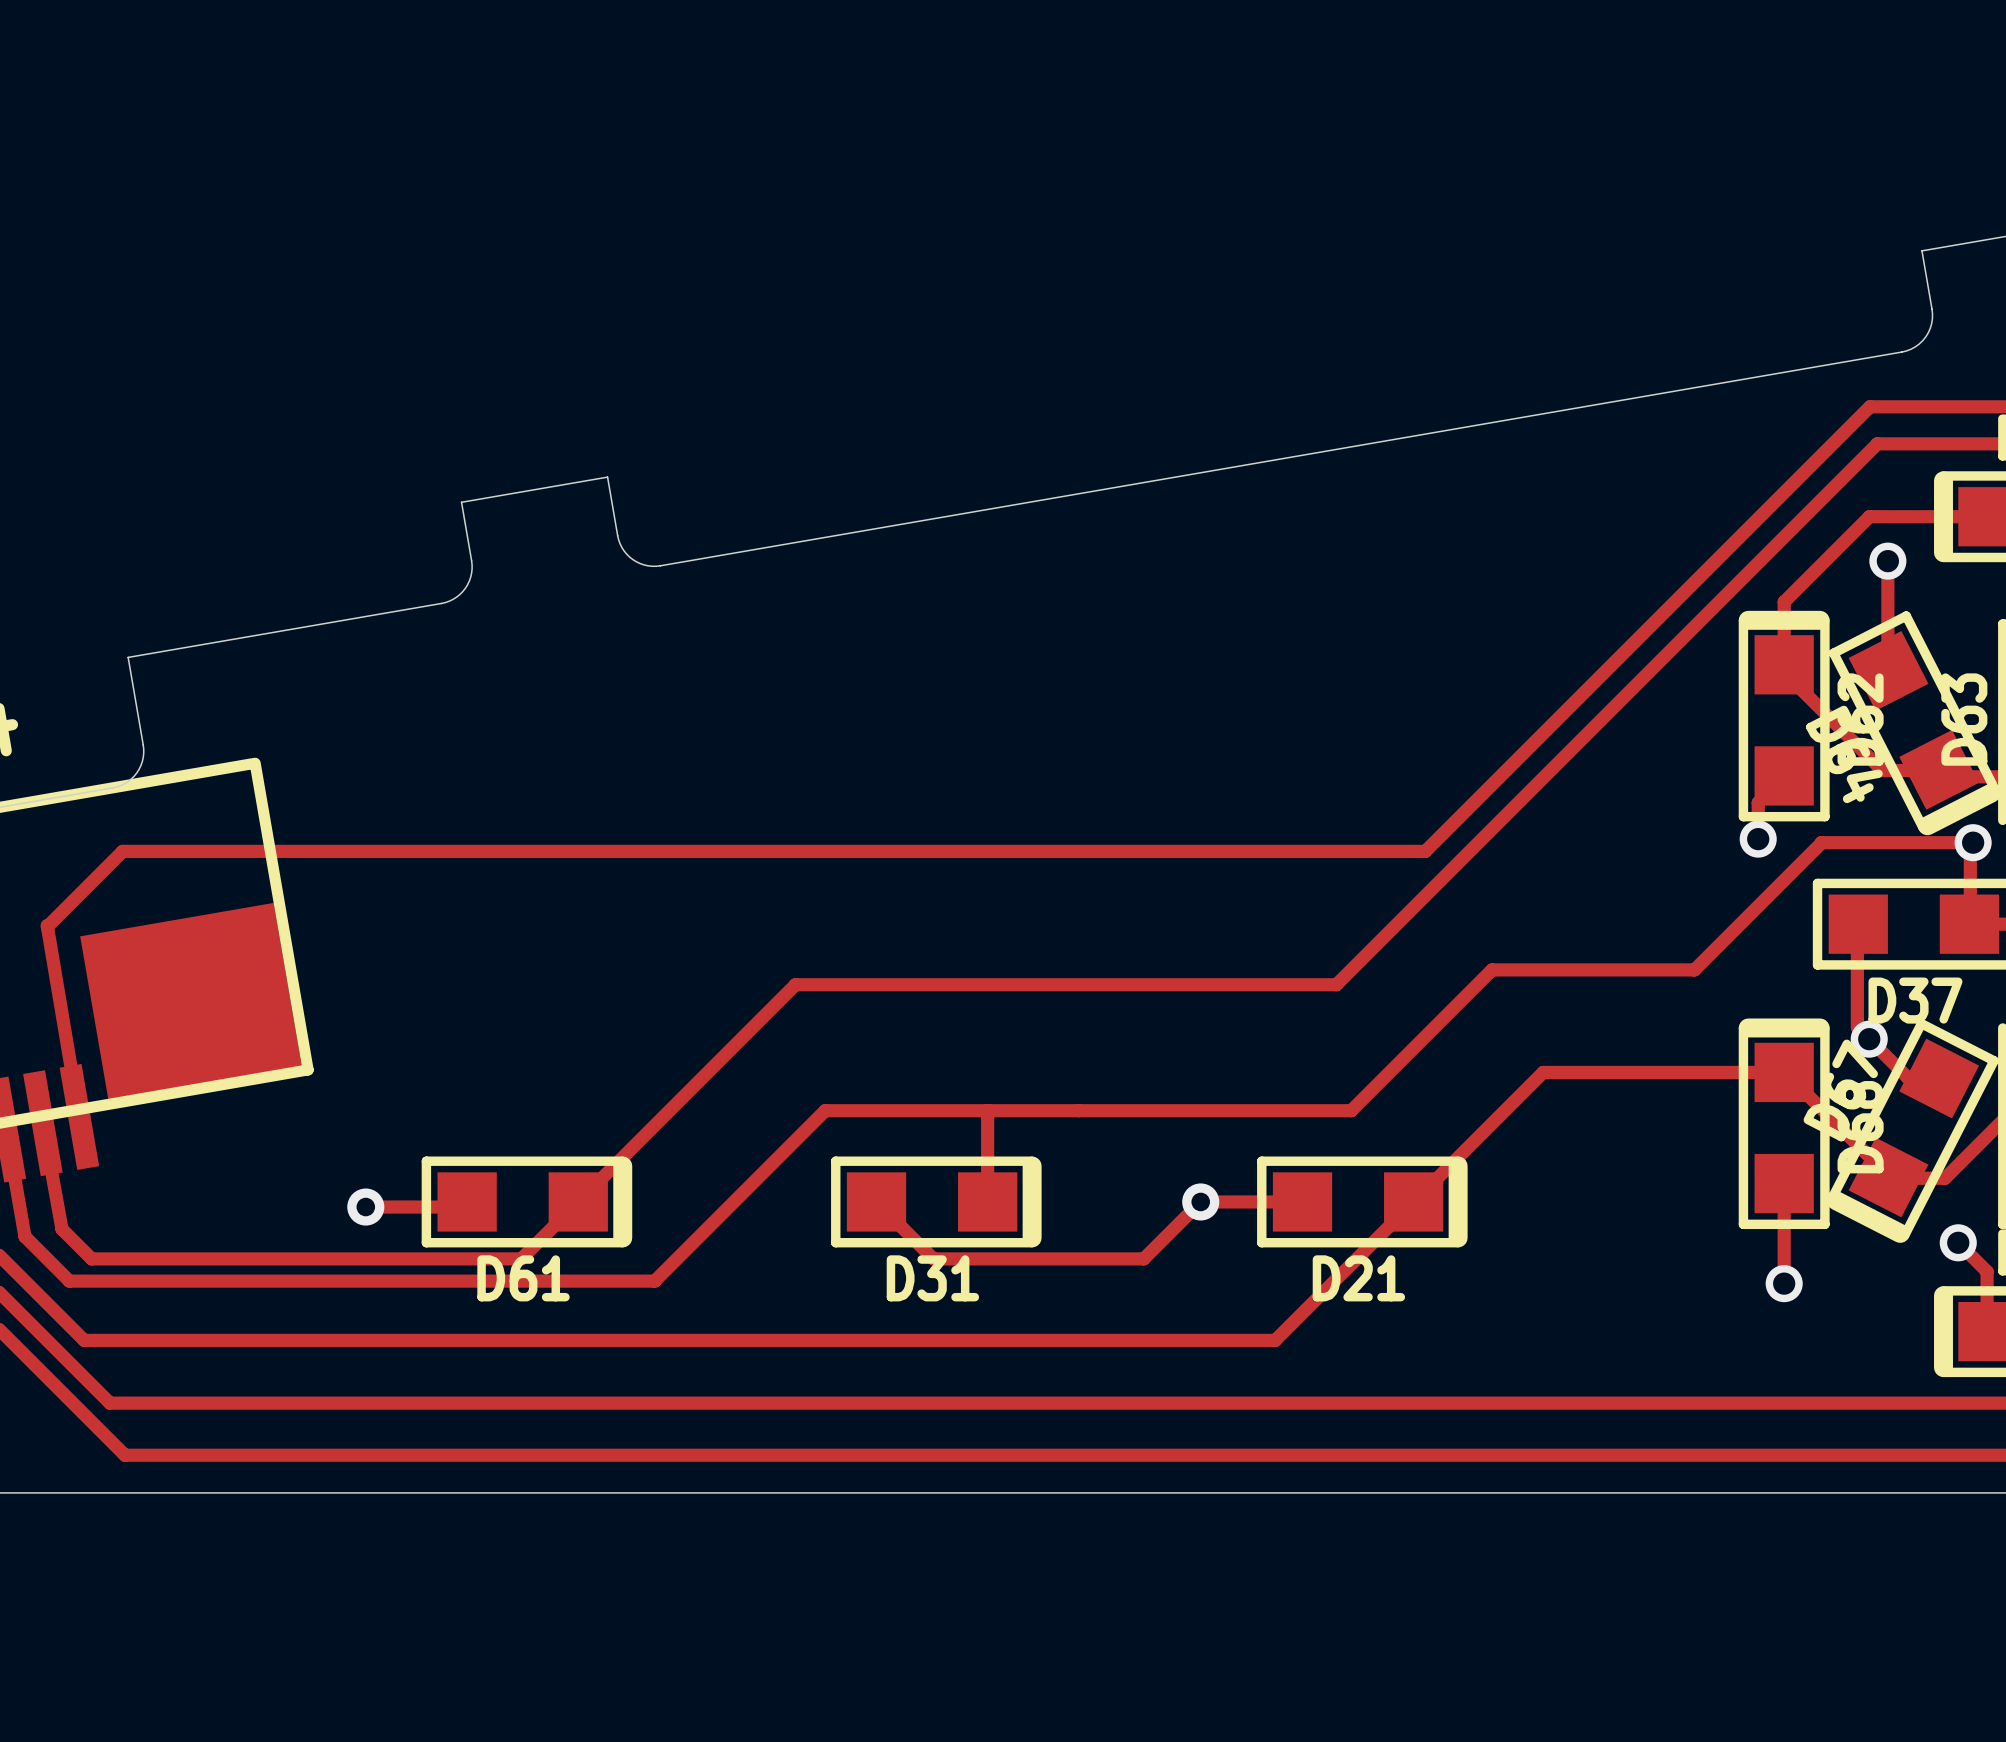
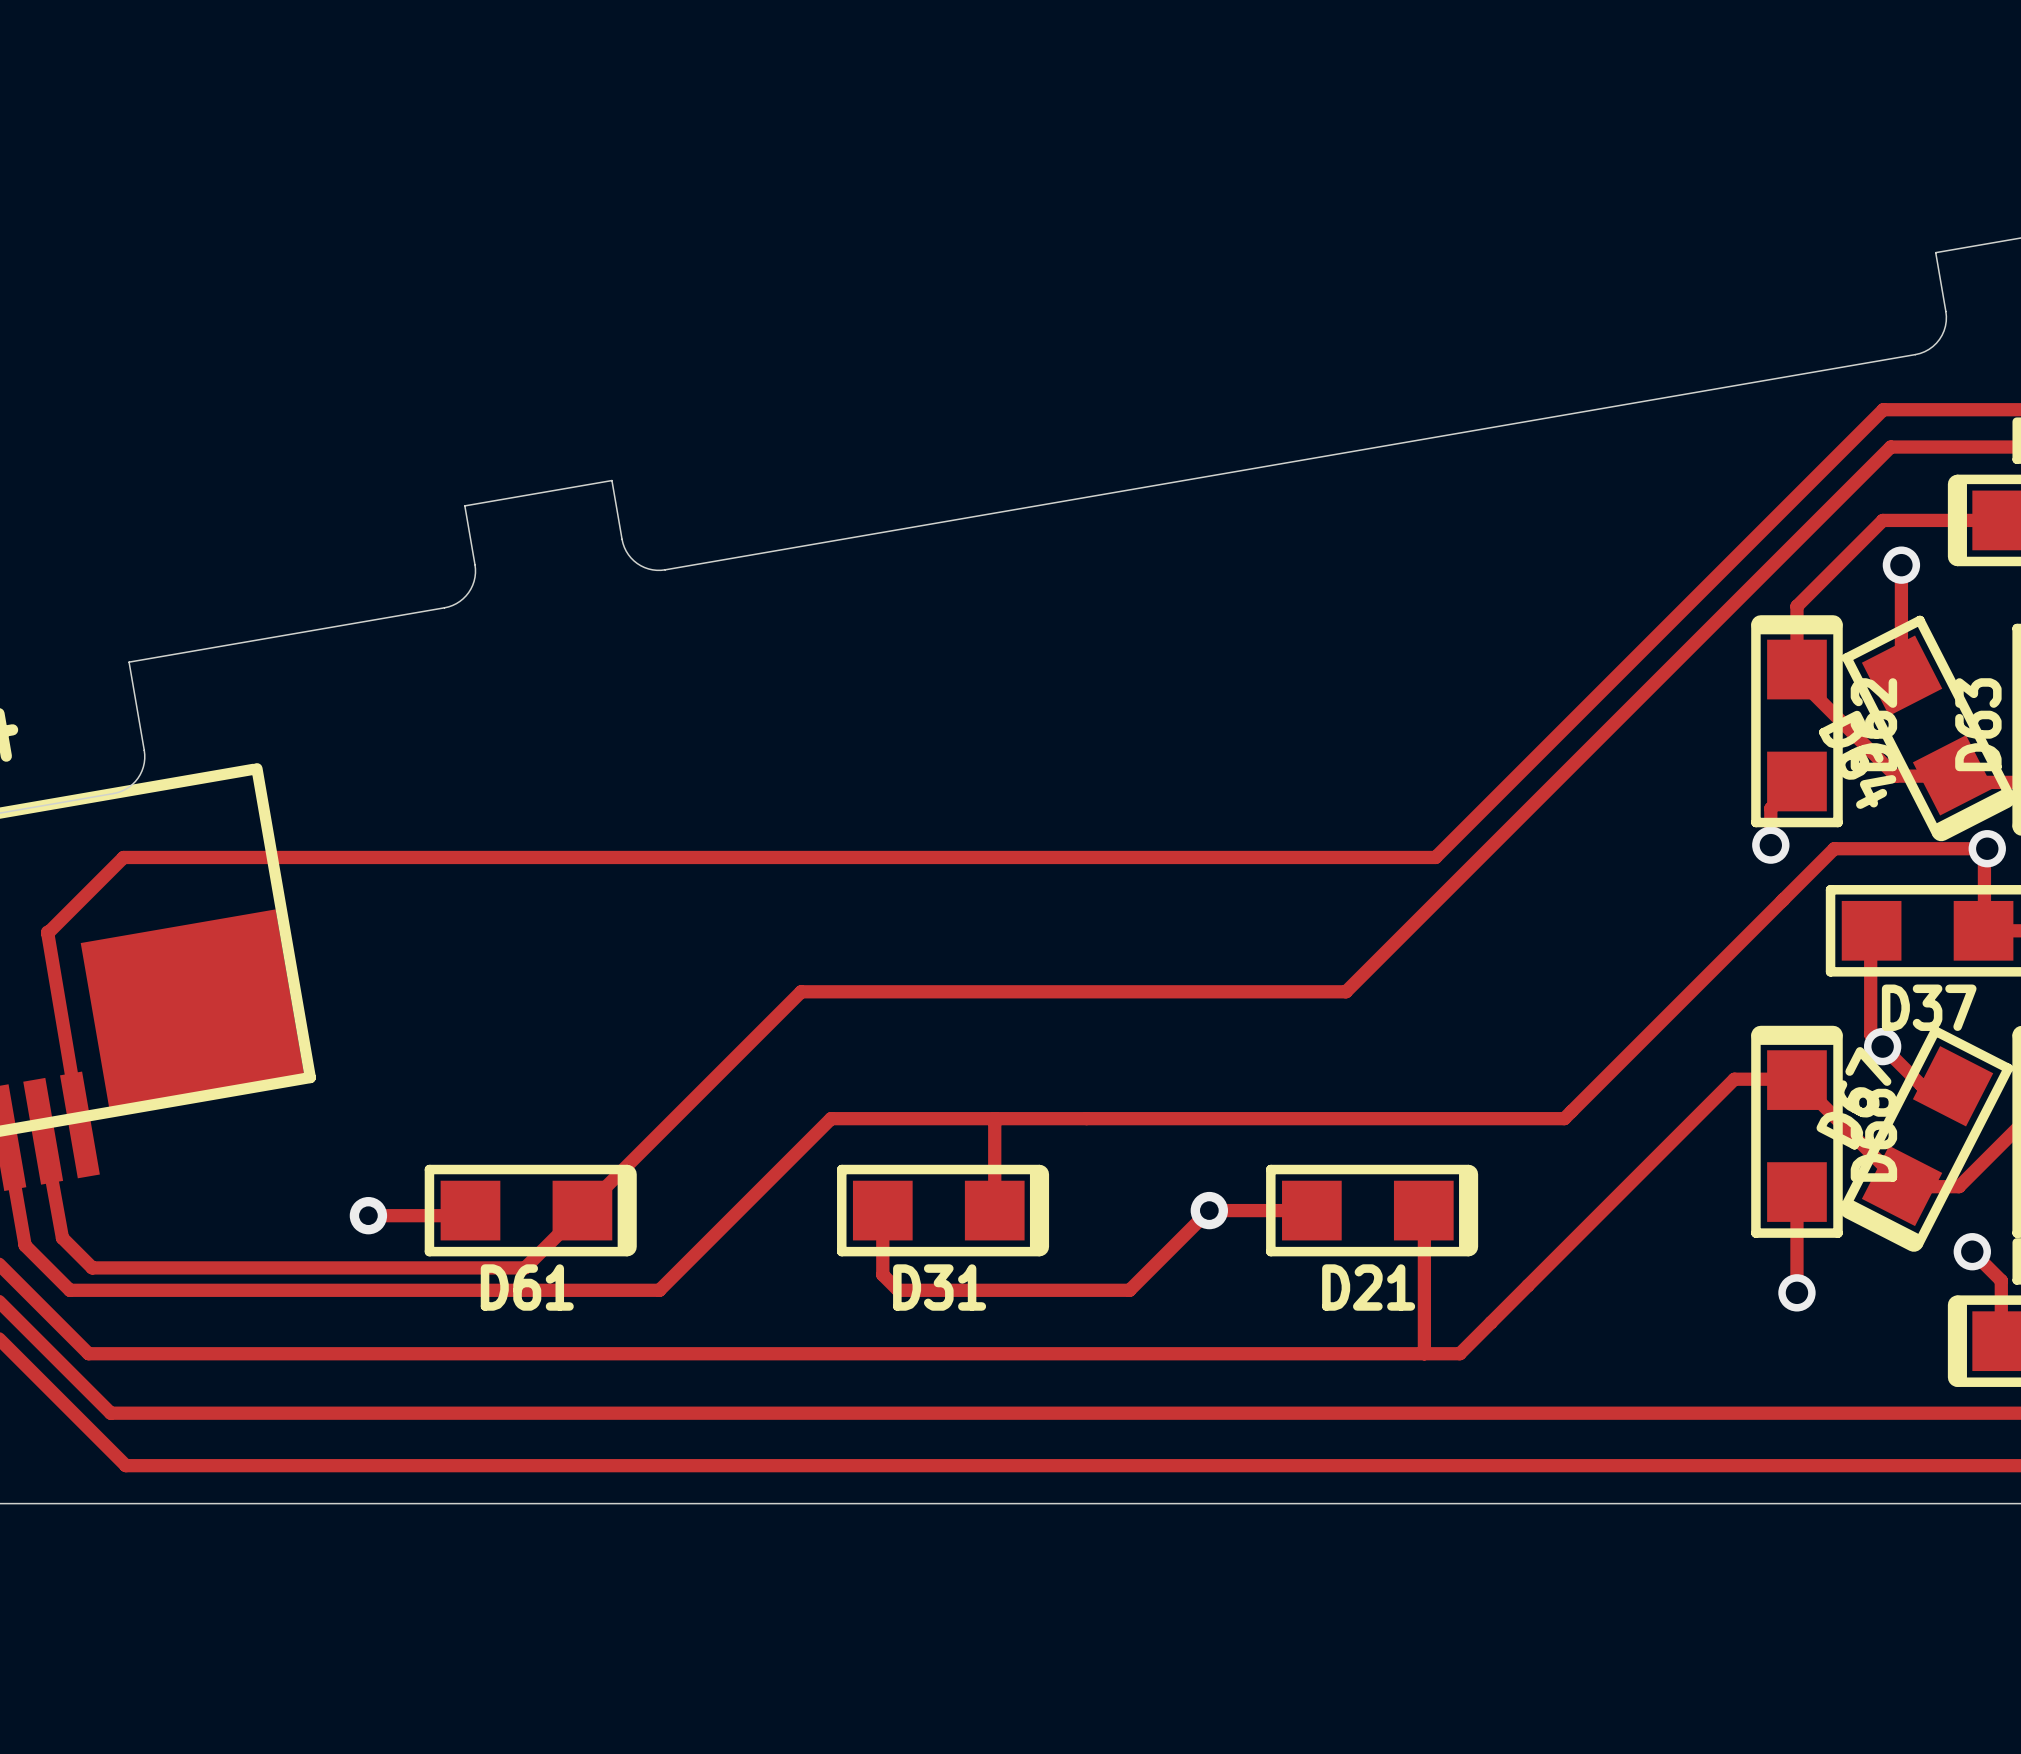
track: (1821, 842) (1694, 969) (1492, 969) (1351, 1110) -> (1834, 848) (1564, 1118) (1360, 1118)
track: (1784, 1072) (1543, 1072) (1275, 1340) (84, 1340) -> (1796, 1079) (1734, 1079) (1459, 1353) (88, 1353) (84, 1350)
track: (876, 1201) (933, 1258) (1143, 1258) -> (882, 1210) (882, 1274) (898, 1290) (1129, 1290) (1152, 1267)
track: none -> (1424, 1211) (1424, 1353)

